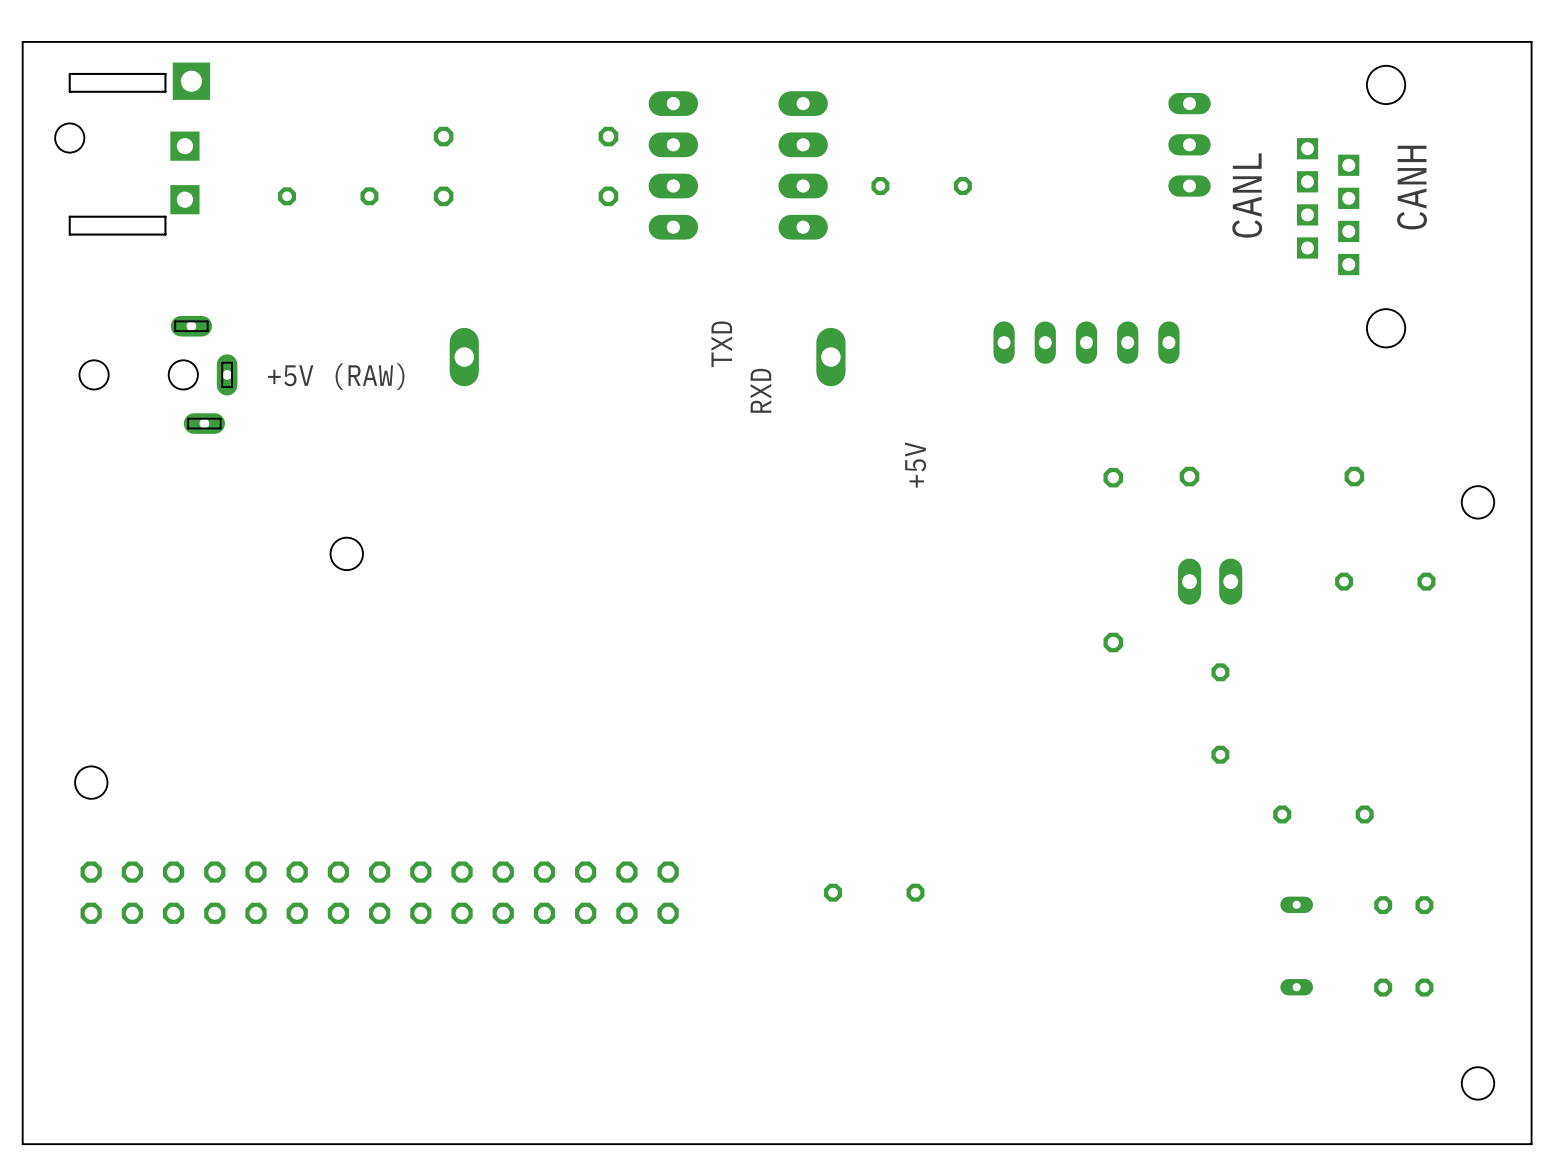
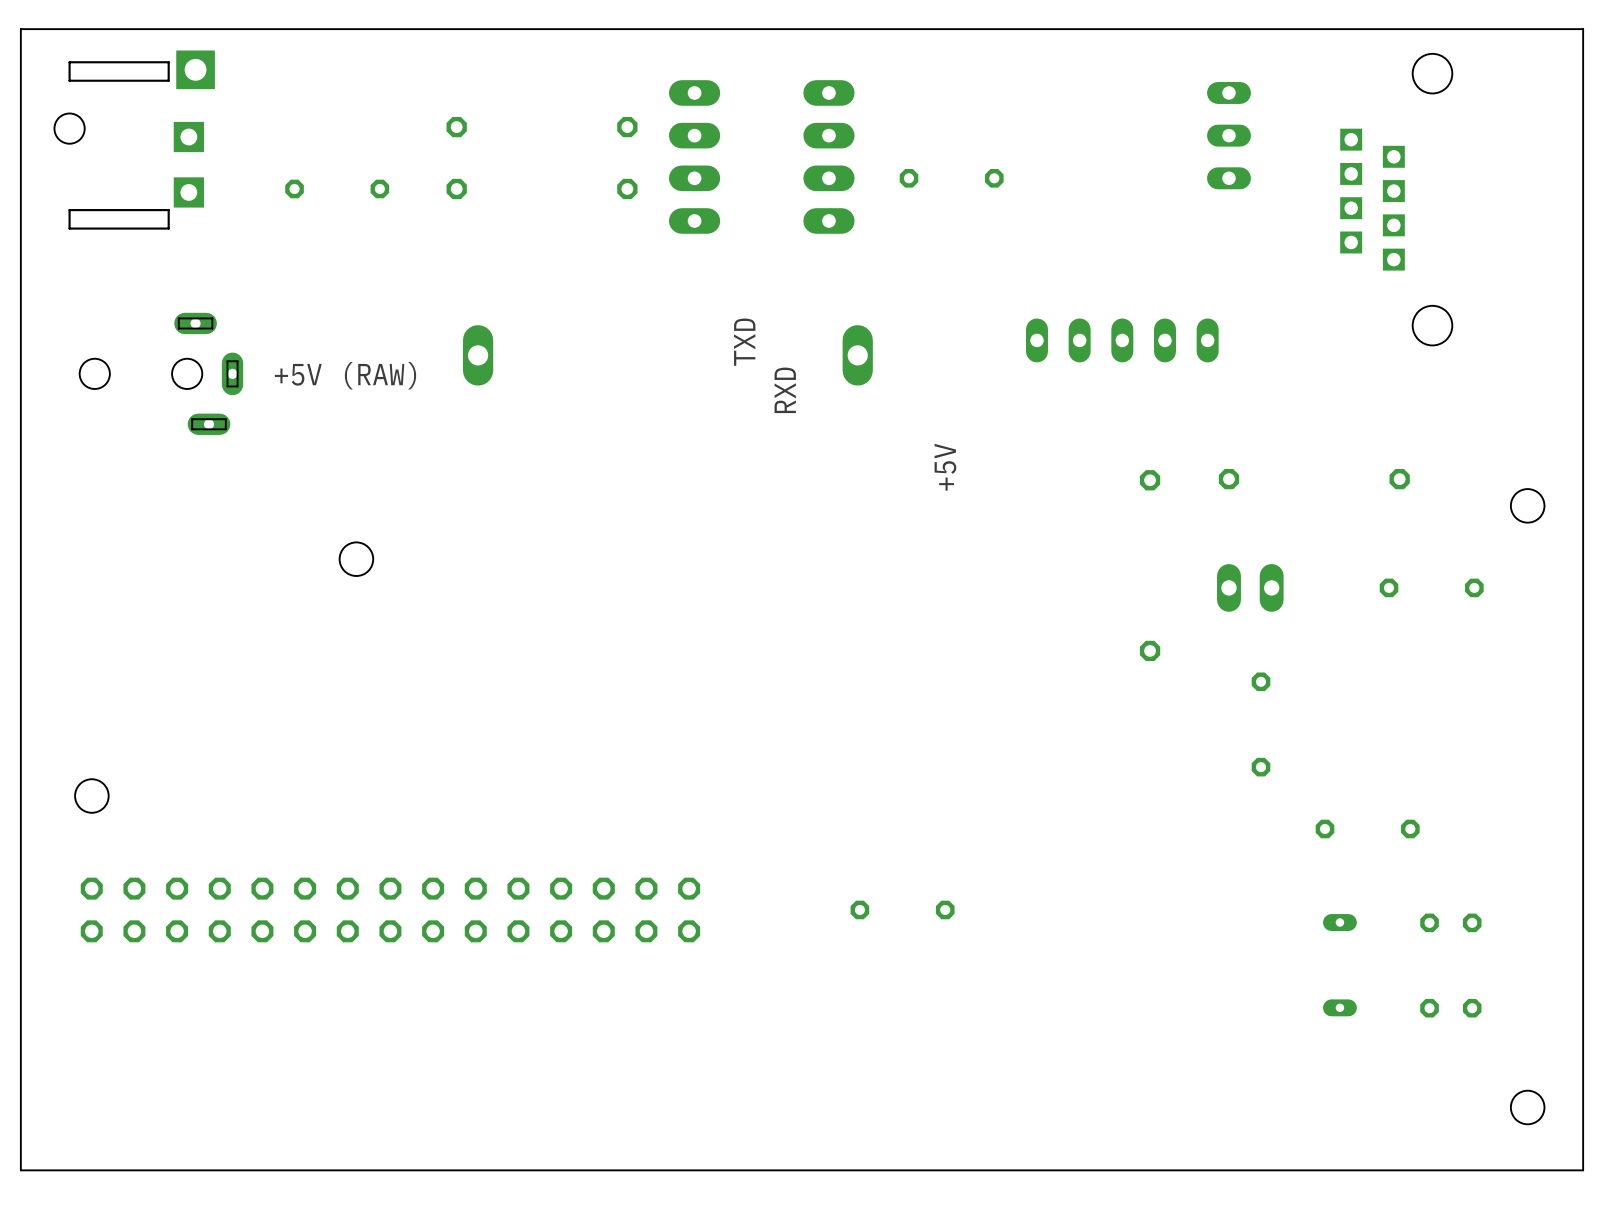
text: CANH (1412, 187) -> none
text: CANL (1247, 195) -> none

